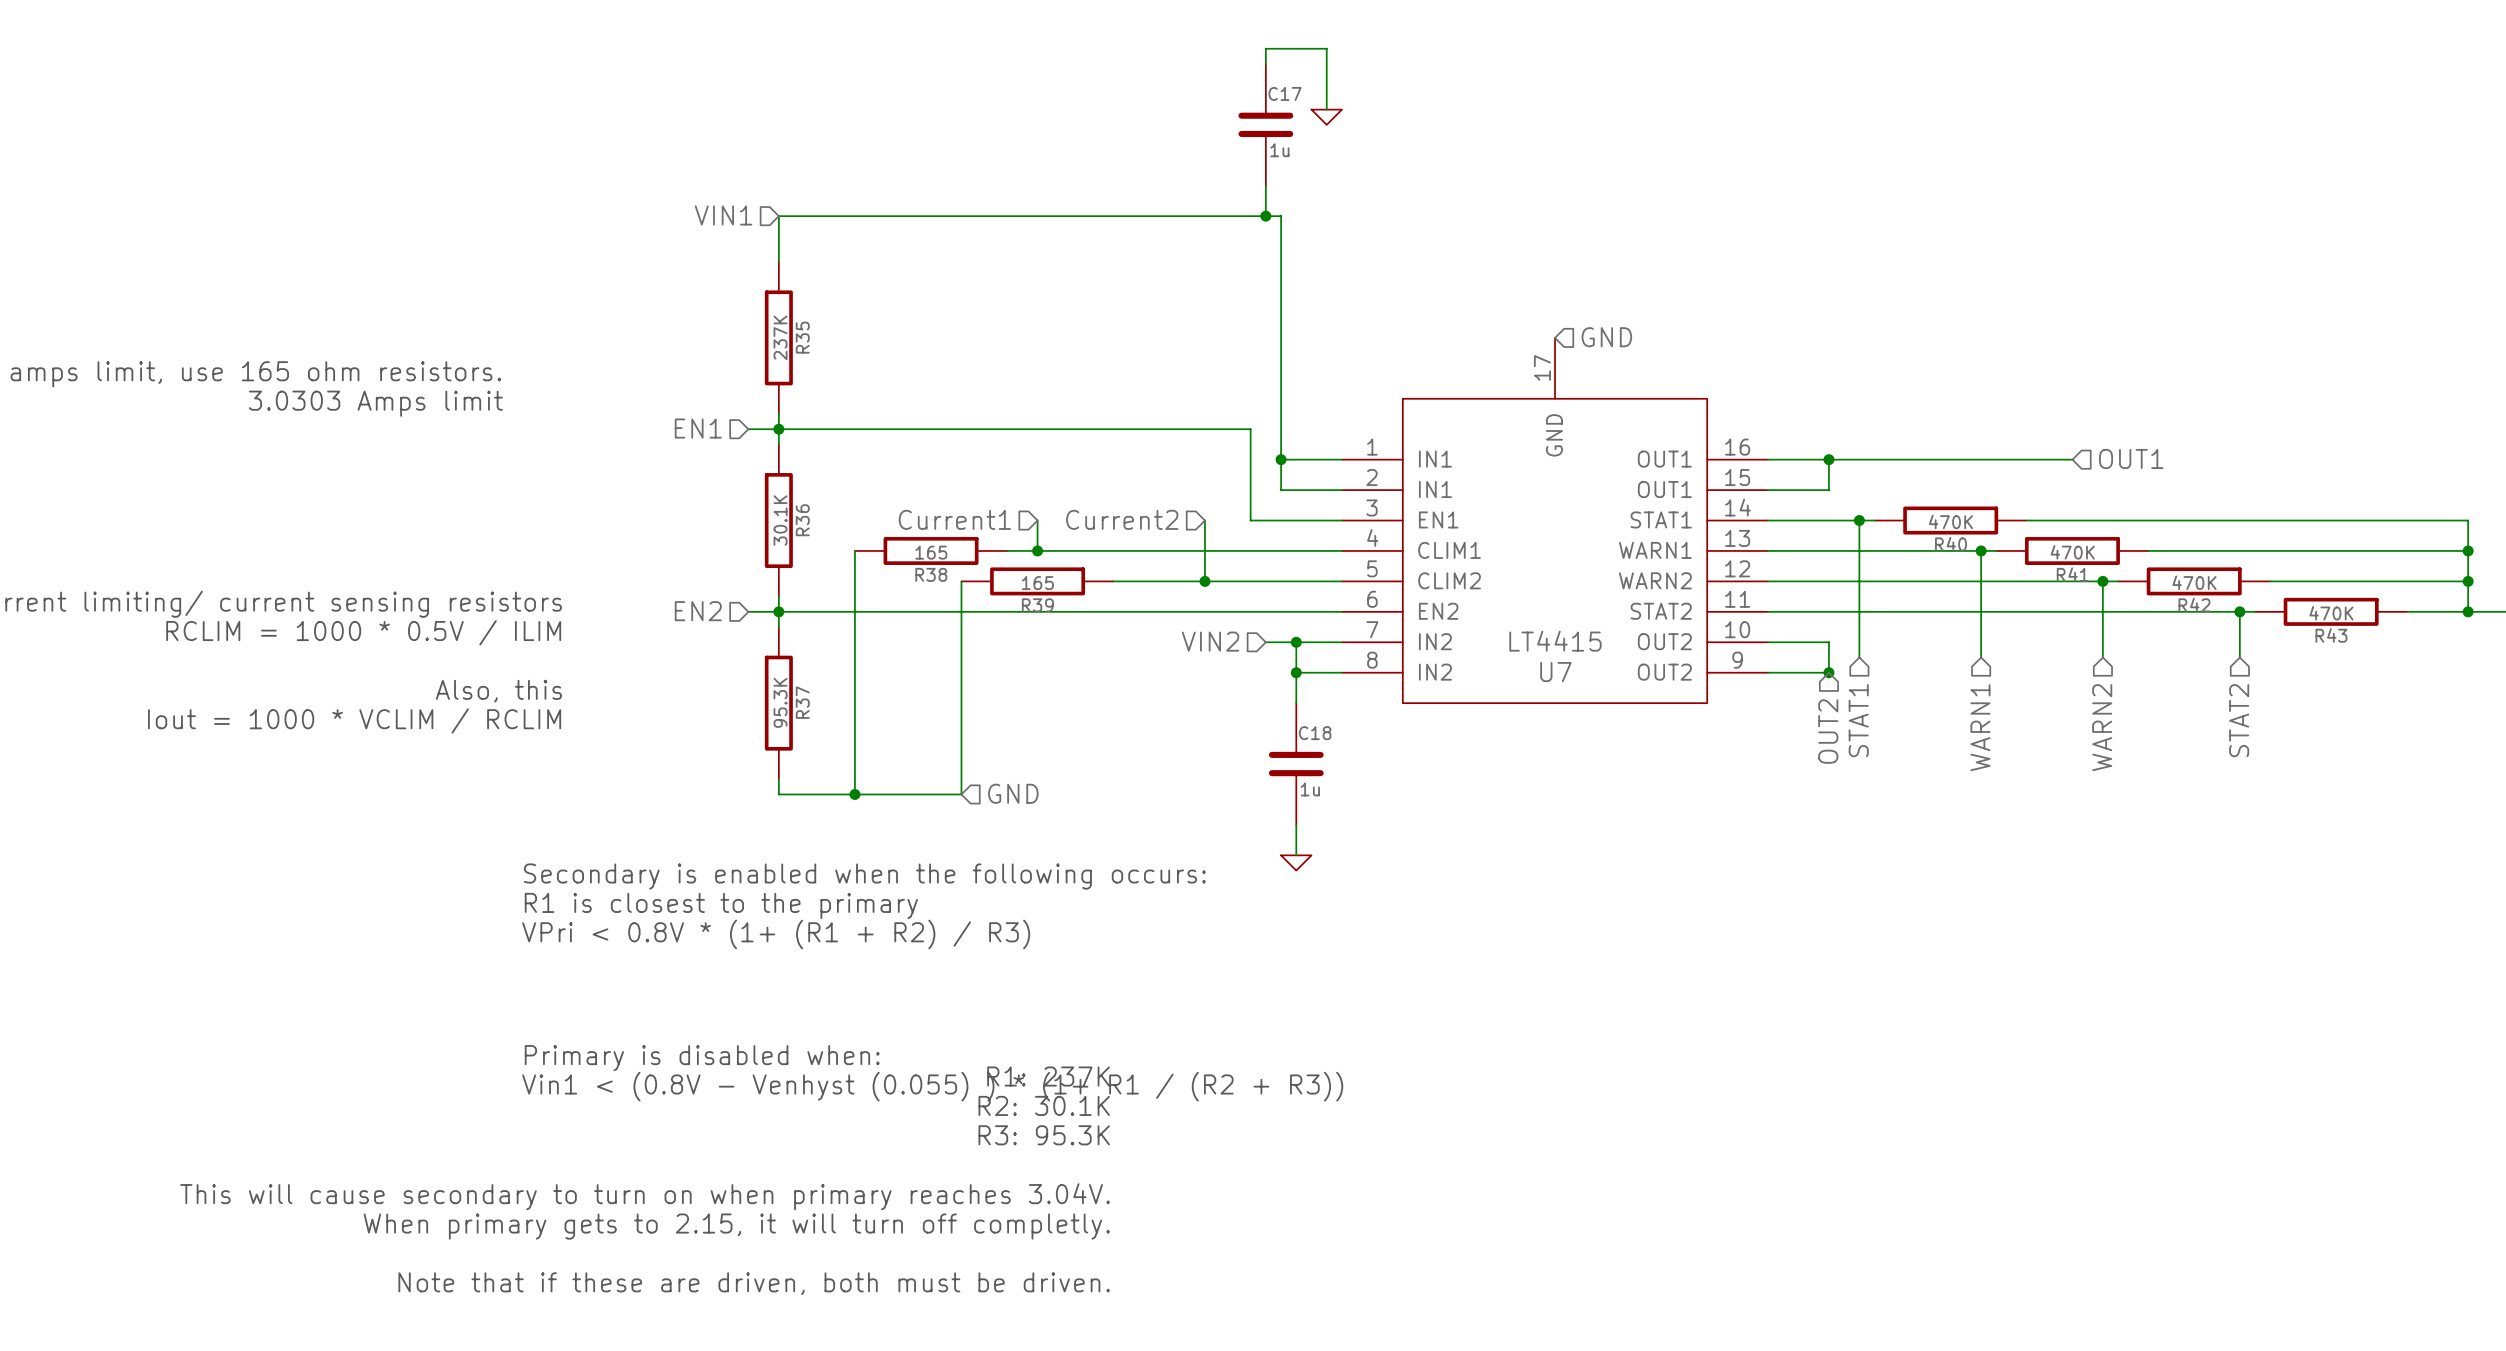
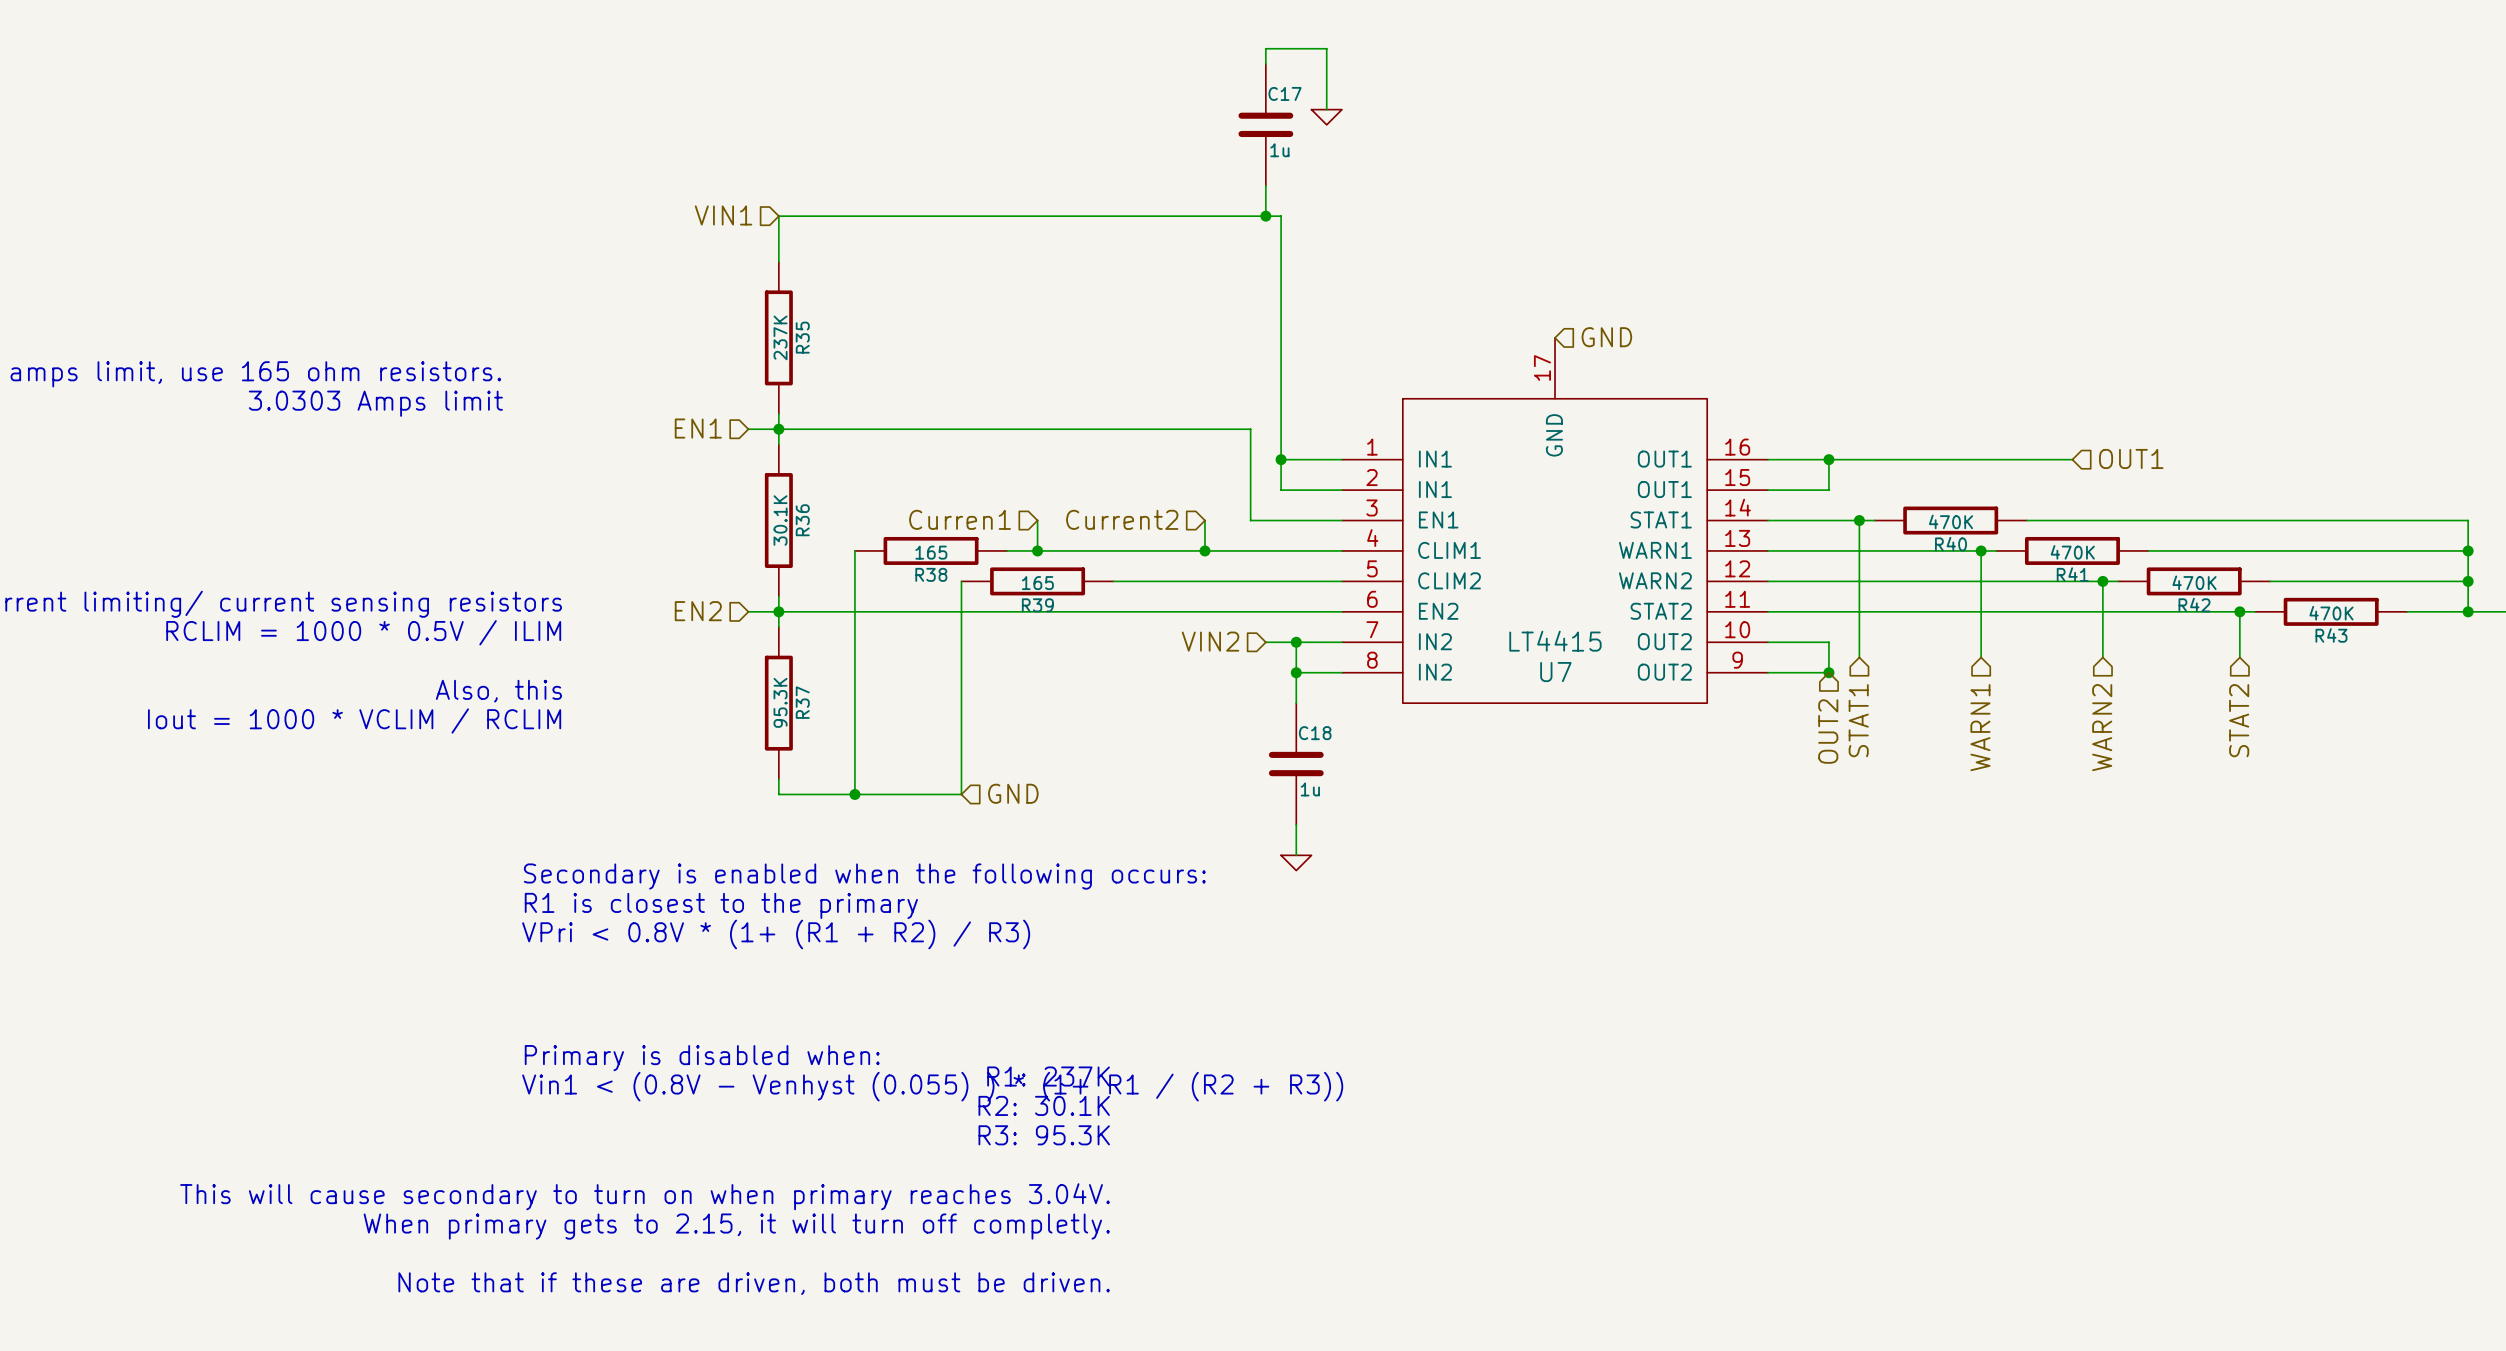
hierarchical label: Current1 (954, 519) -> Curren1 (960, 519)
wire: (1204, 550) (1204, 581) -> none
junction position: (1204, 581) -> (1204, 550)

